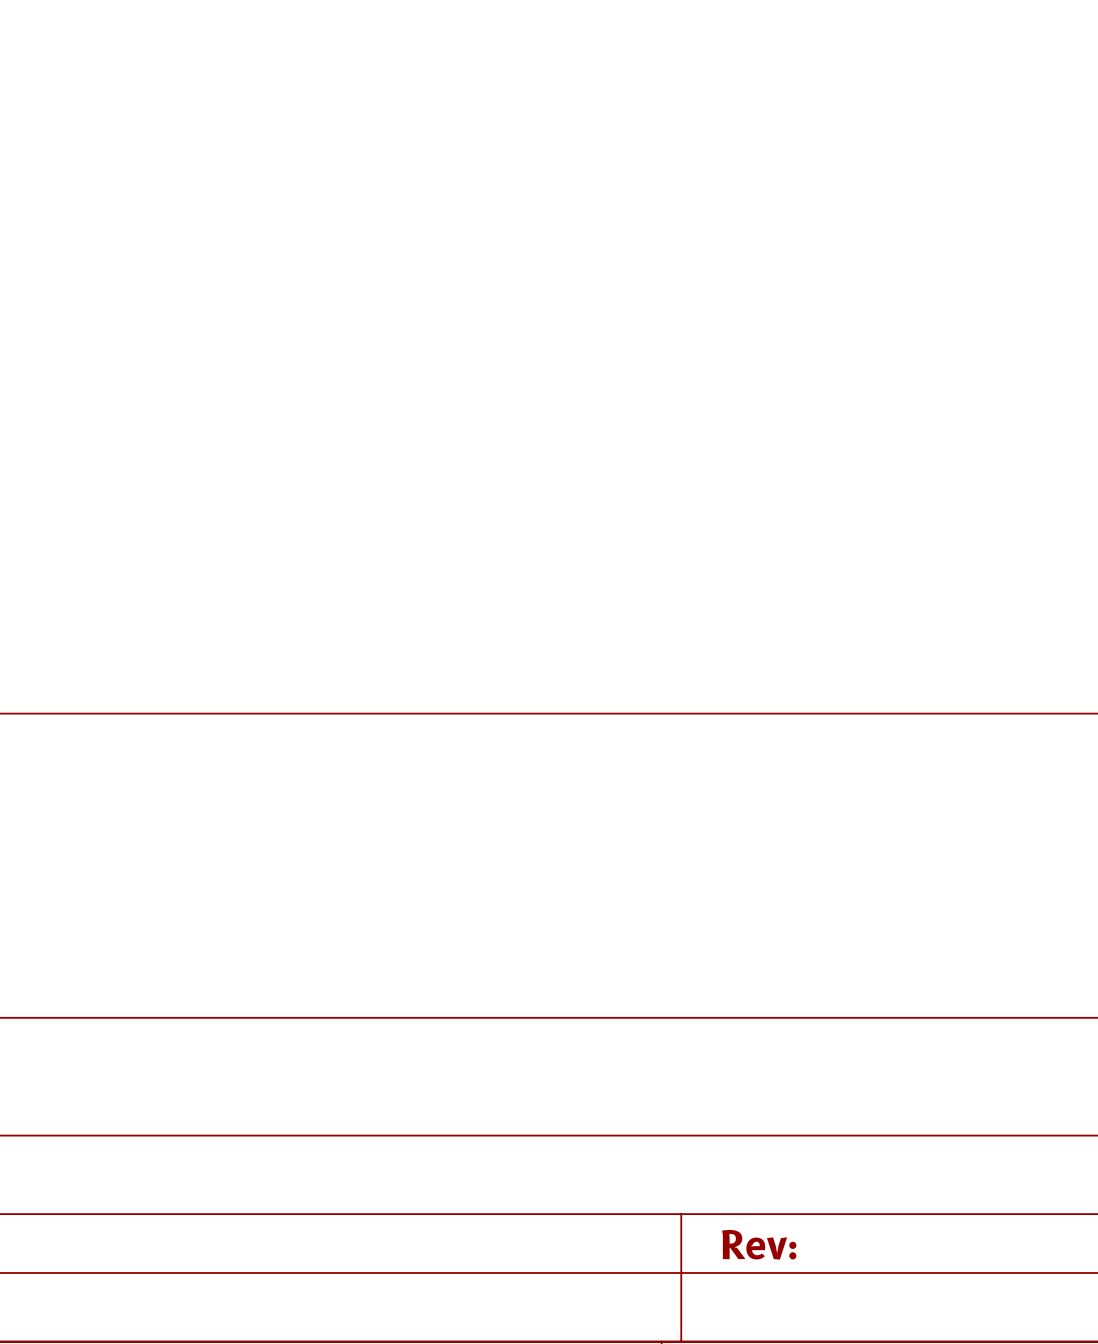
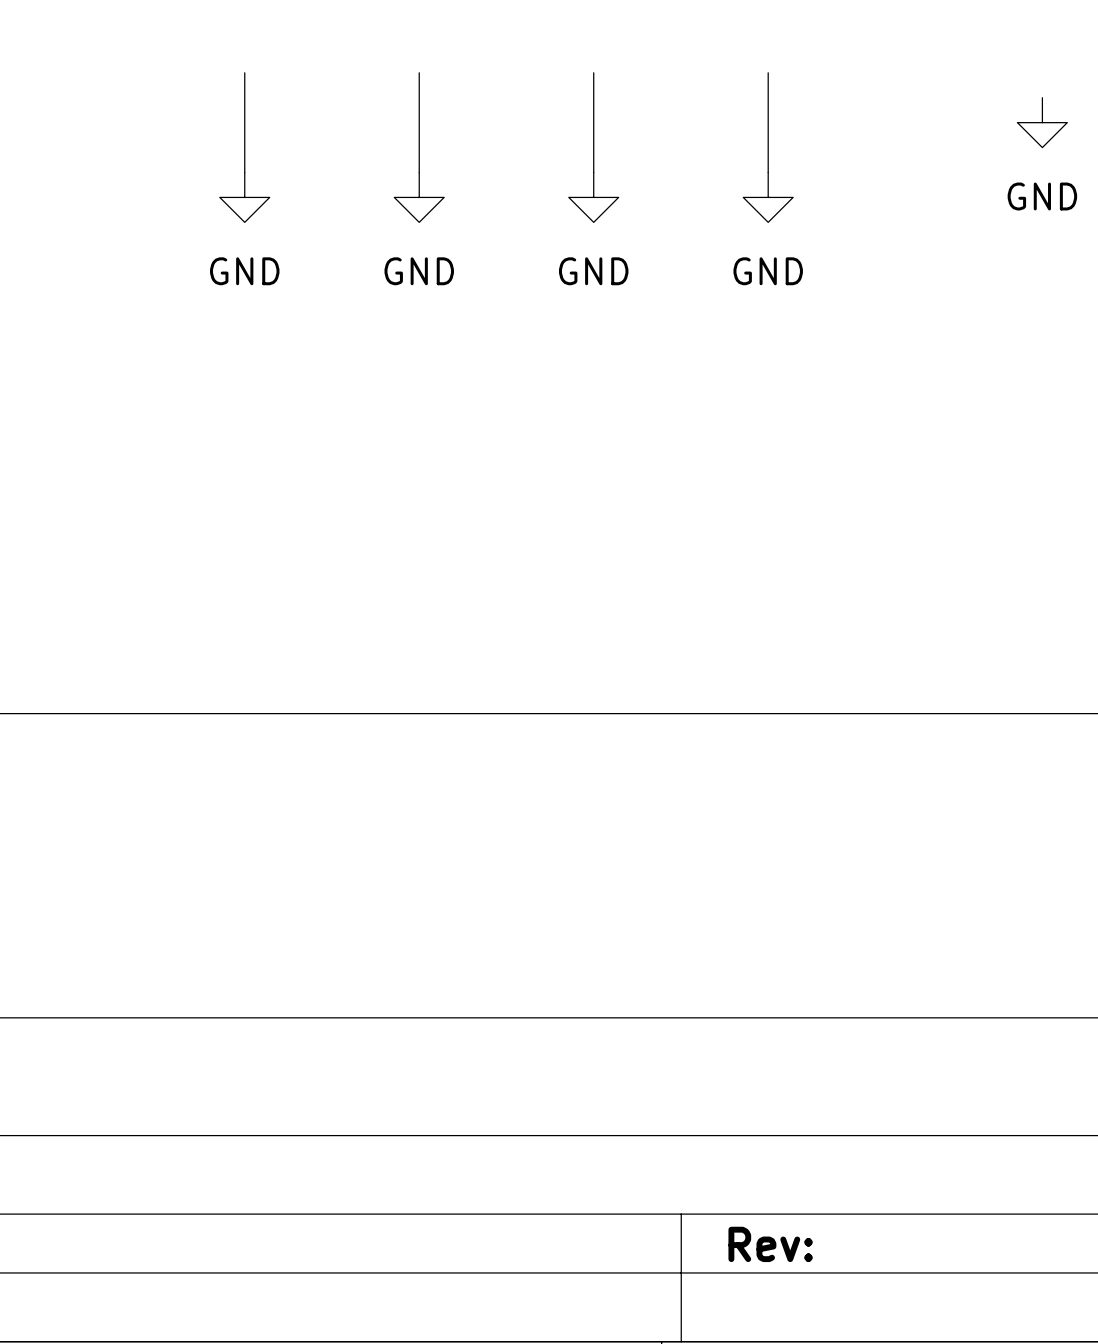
wire: none -> (244, 72) (244, 172)
wire: none -> (419, 72) (419, 172)
wire: none -> (593, 72) (593, 172)
wire: none -> (768, 72) (768, 172)
power symbol: none -> GND (1042, 122)
power symbol: none -> GND (244, 197)
power symbol: none -> GND (419, 197)
power symbol: none -> GND (593, 197)
power symbol: none -> GND (768, 197)

